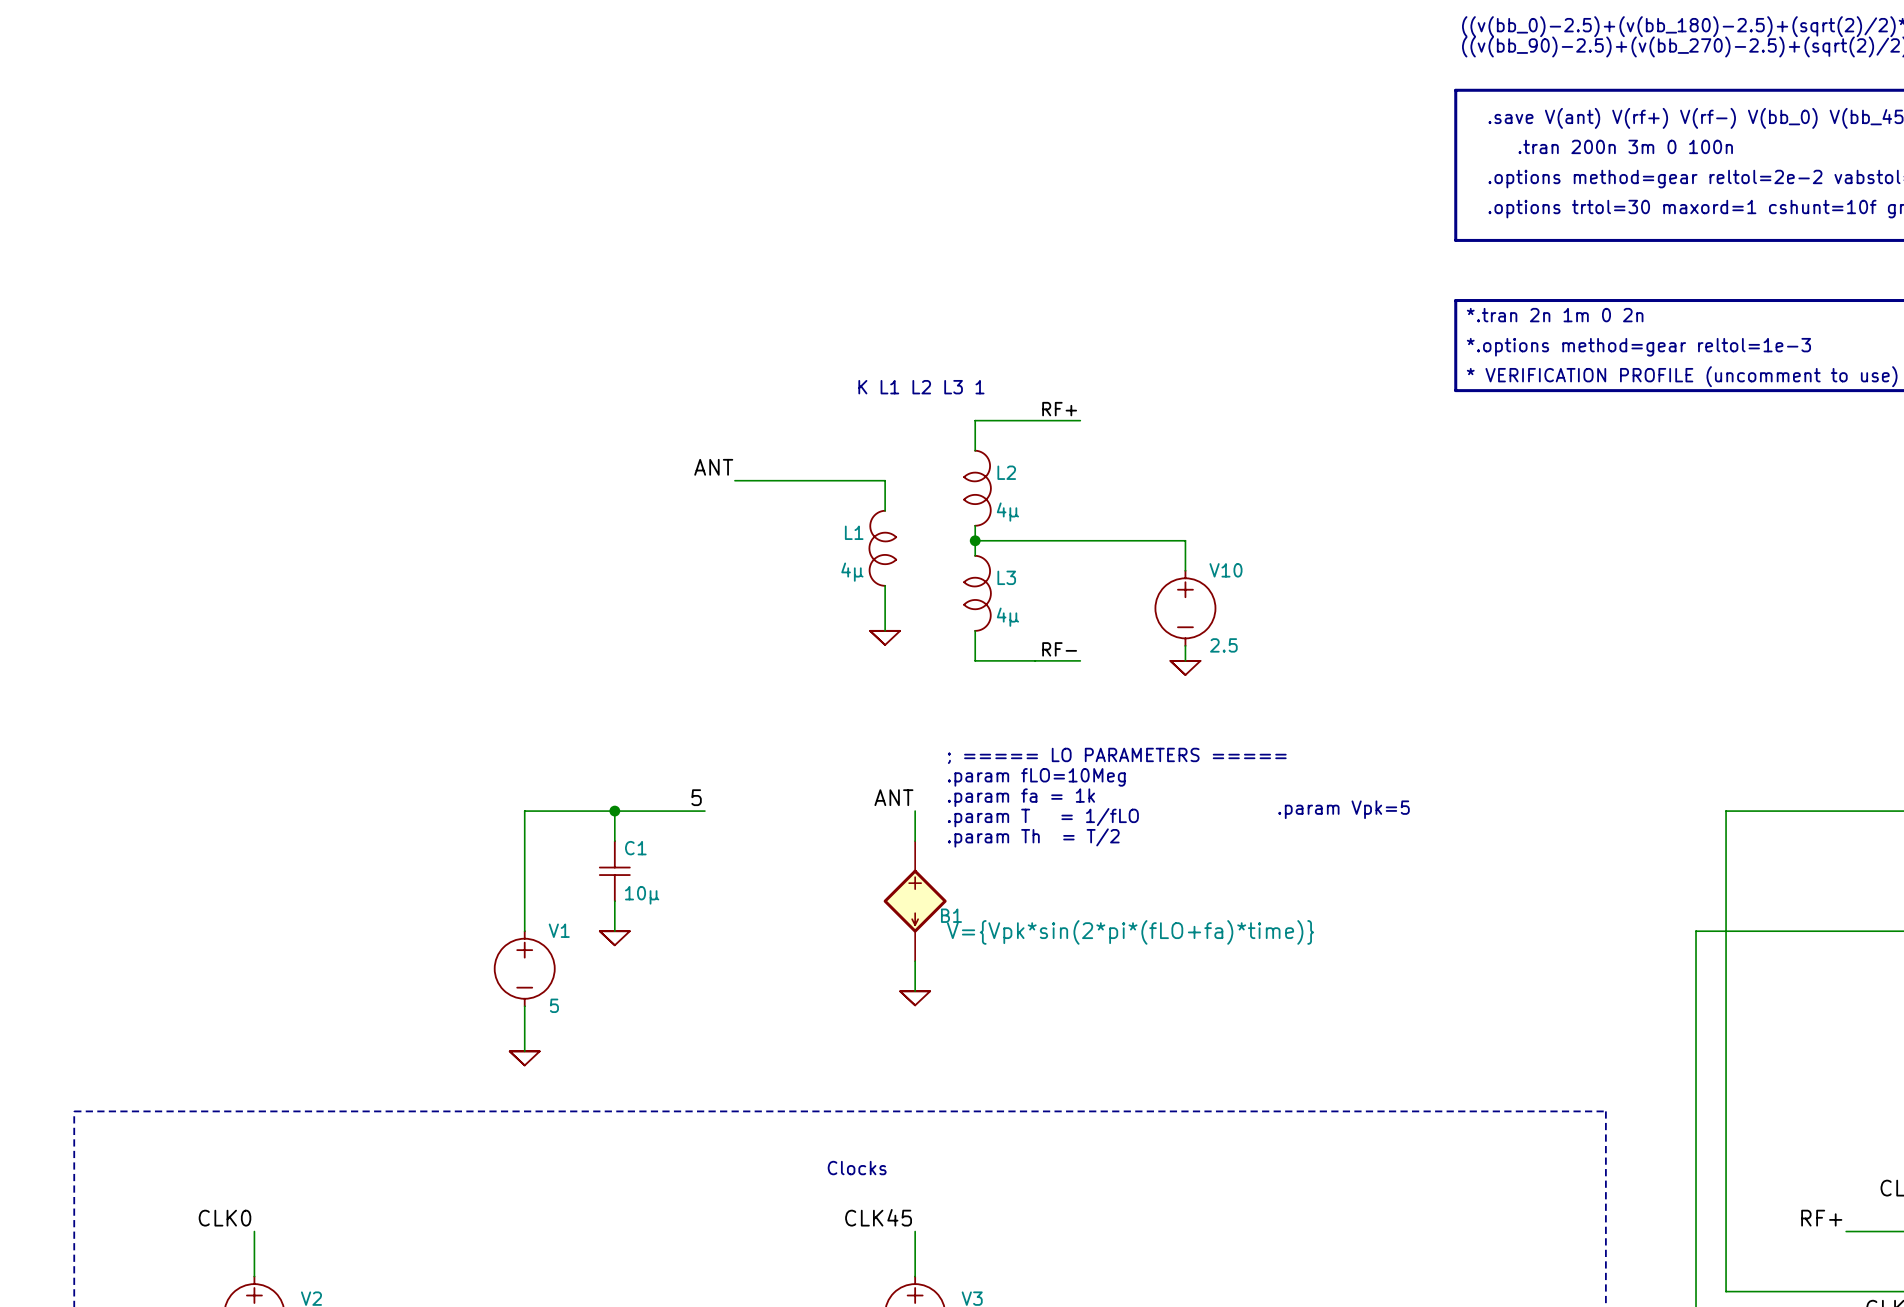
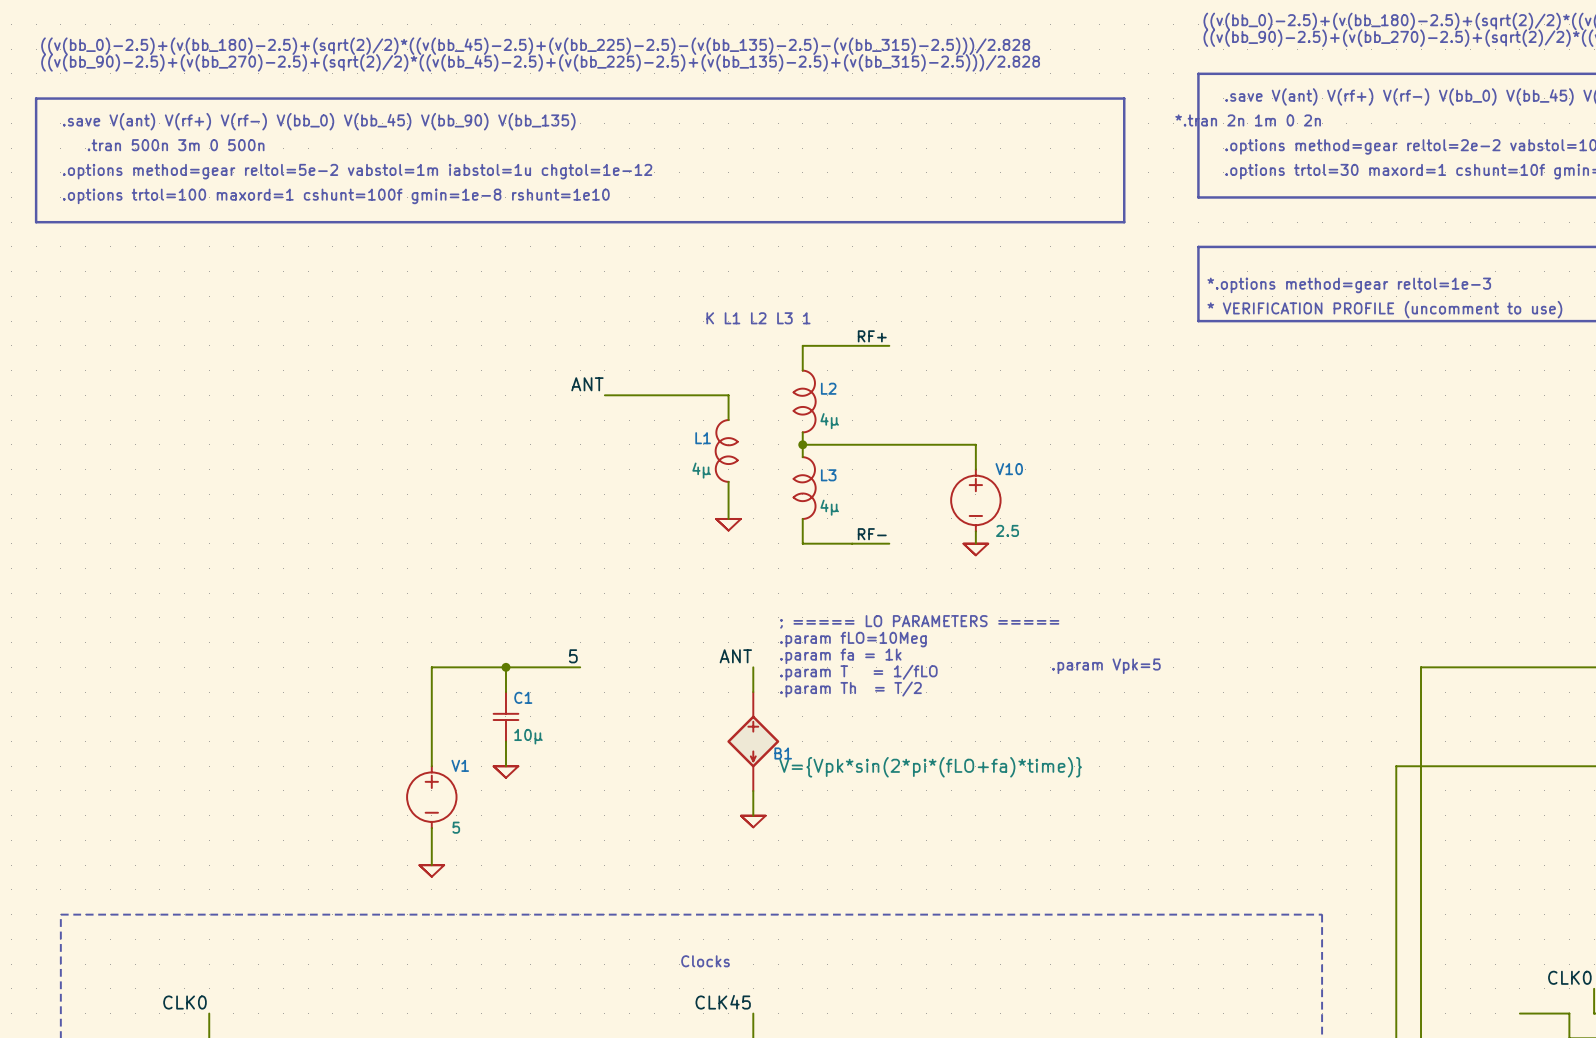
text: none -> ((v(bb_0)-2.5)+(v(bb_180)-2.5)+(sqrt(2)/2)*((v(bb_45)-2.5)+(v(bb_225)-2.5)-(v(bb_135)-2.5)-(v(bb_315)-2.5)))/2.828 (535, 46)
text: none -> ((v(bb_90)-2.5)+(v(bb_270)-2.5)+(sqrt(2)/2)*((v(bb_45)-2.5)+(v(bb_225)-2.5)+(v(bb_135)-2.5)+(v(bb_315)-2.5)))/2.828 (540, 62)
line: none -> (36, 98) (1124, 98) (1124, 222) (36, 222) (36, 98)
text: .tran 200n 3m 0 100n (1625, 146) -> none
text: none -> .save V(ant) V(rf+) V(rf-) V(bb_0) V(bb_45) V(bb_90) V(bb_135) (319, 121)
text: none -> .tran 500n 3m 0 500n (176, 145)
text: none -> .options method=gear reltol=5e-2 vabstol=1m iabstol=1u chgtol=1e-12 (357, 171)
text: none -> .options trtol=100 maxord=1 cshunt=100f gmin=1e-8 rshunt=1e10 (336, 196)
text position: *.tran 2n 1m 0 2n (1555, 315) -> *.tran 2n 1m 0 2n (1248, 120)
label: RF+ (1821, 1218) -> none

